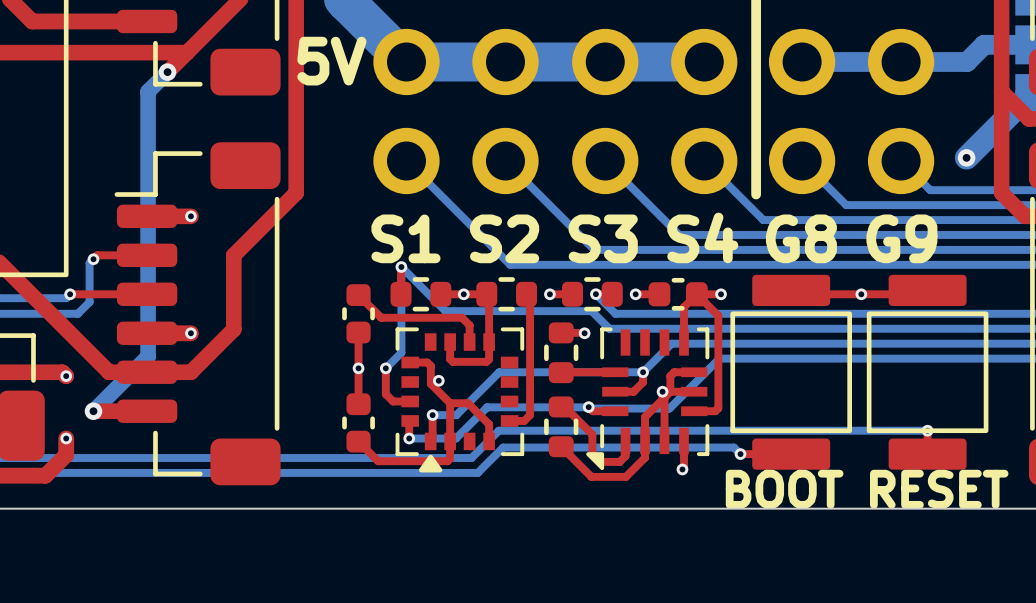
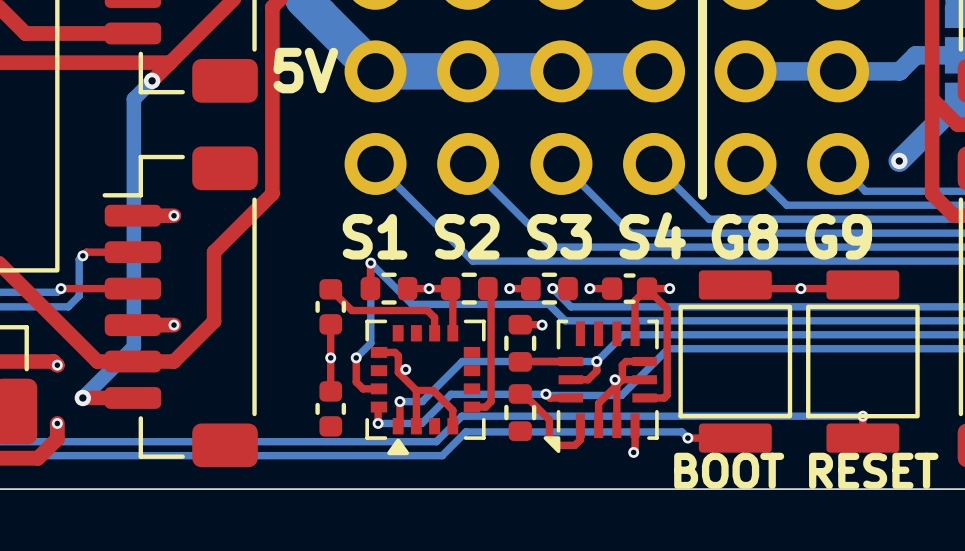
top track: (450, 342) (450, 359) (452, 361) (486, 361) (489, 359) (489, 342) -> none
top track: (645, 440) (645, 457) (625, 476) (591, 476) (561, 446) -> none
top track: (450, 441) (450, 458) (447, 461) (378, 461) (358, 441) -> none

